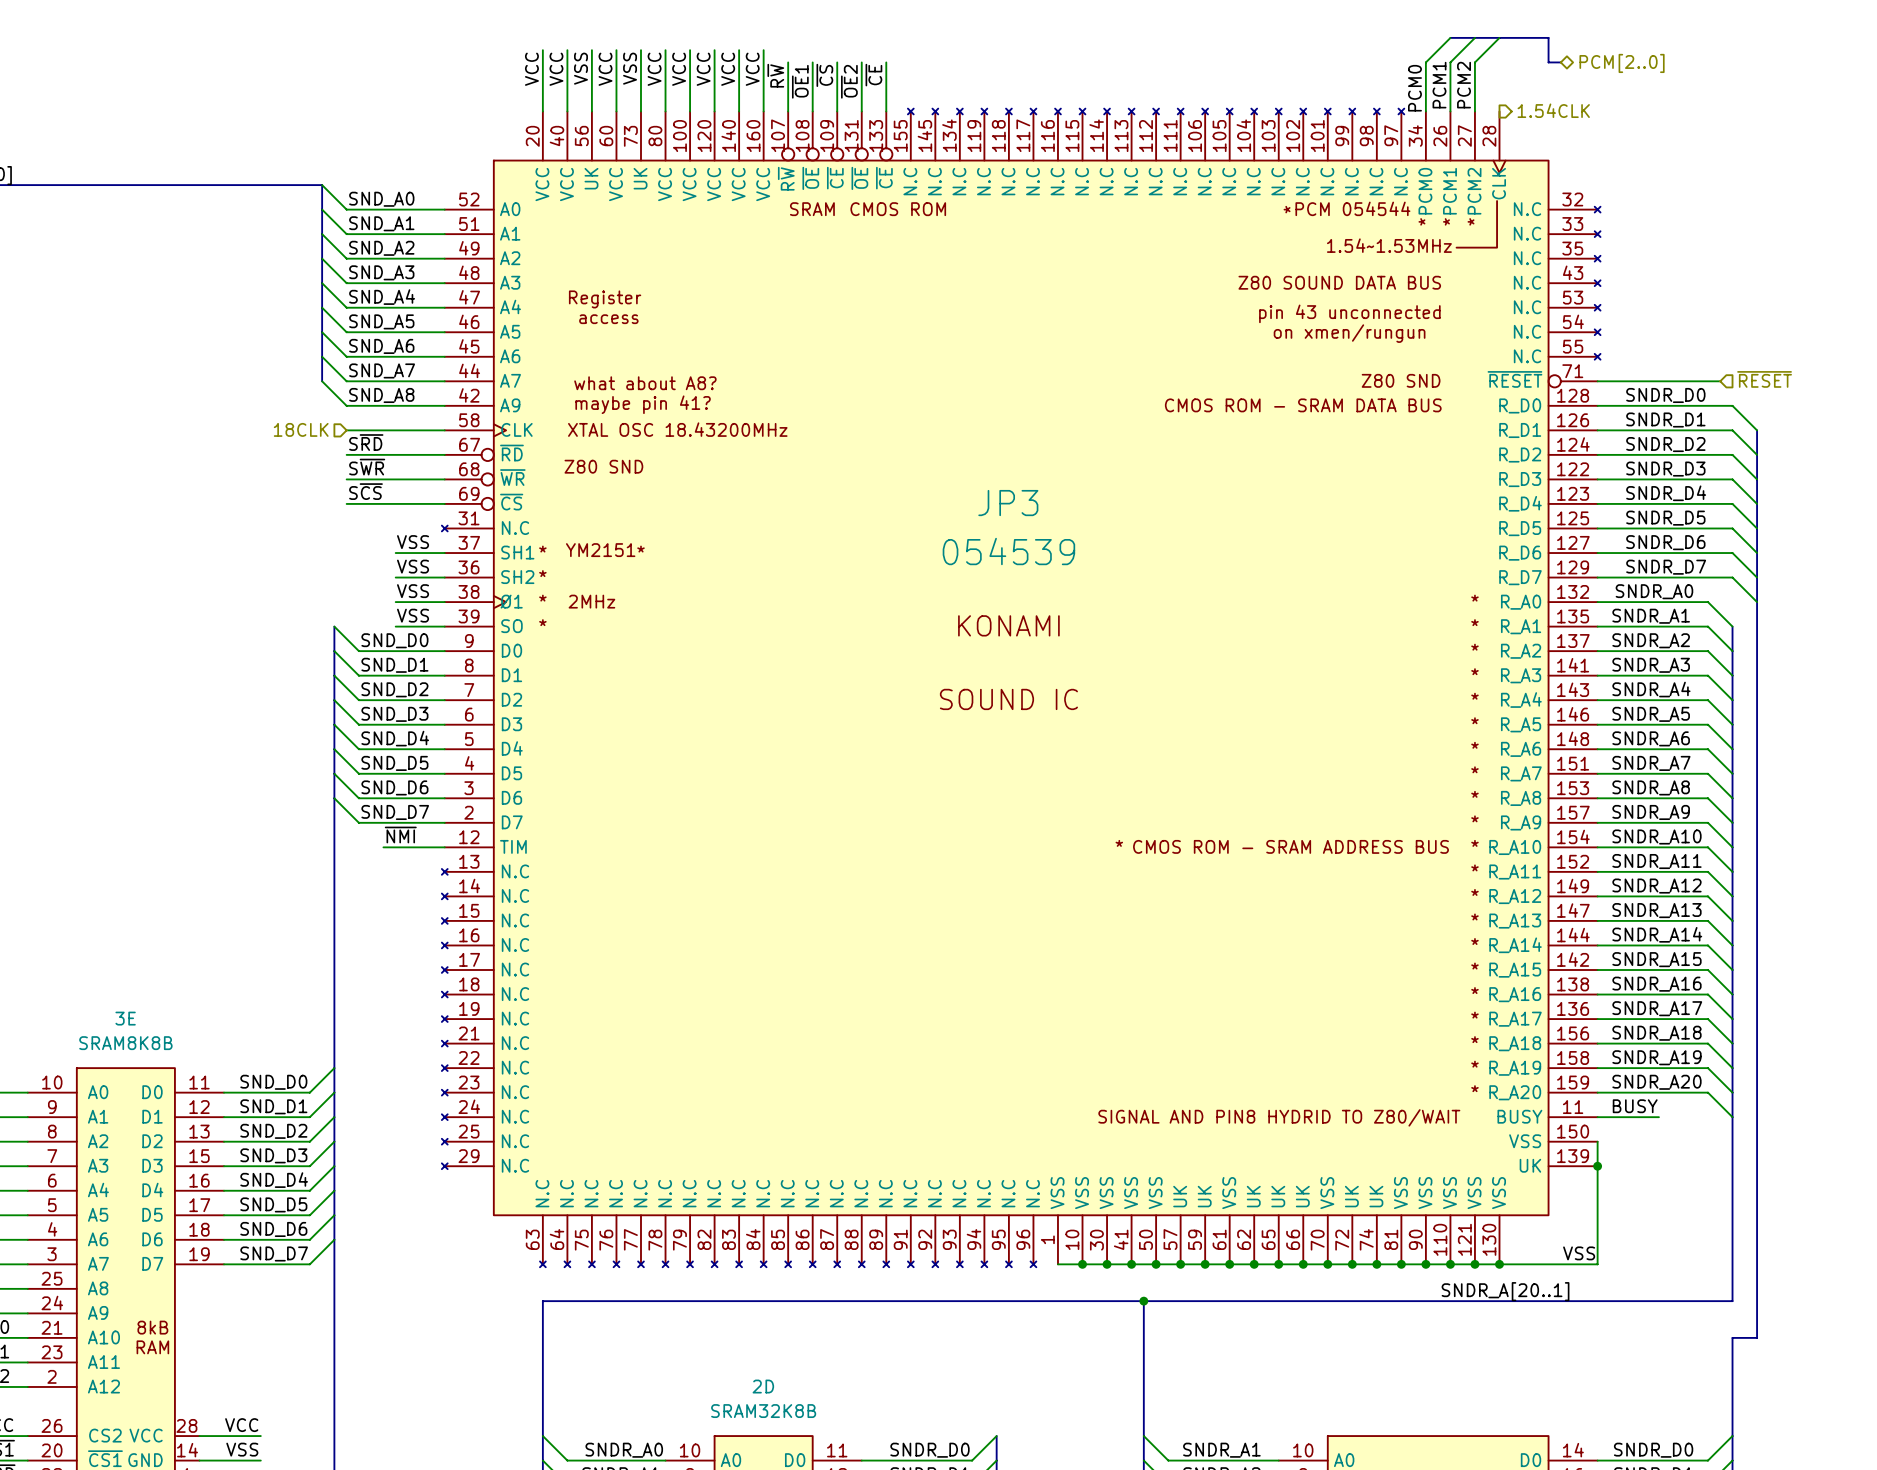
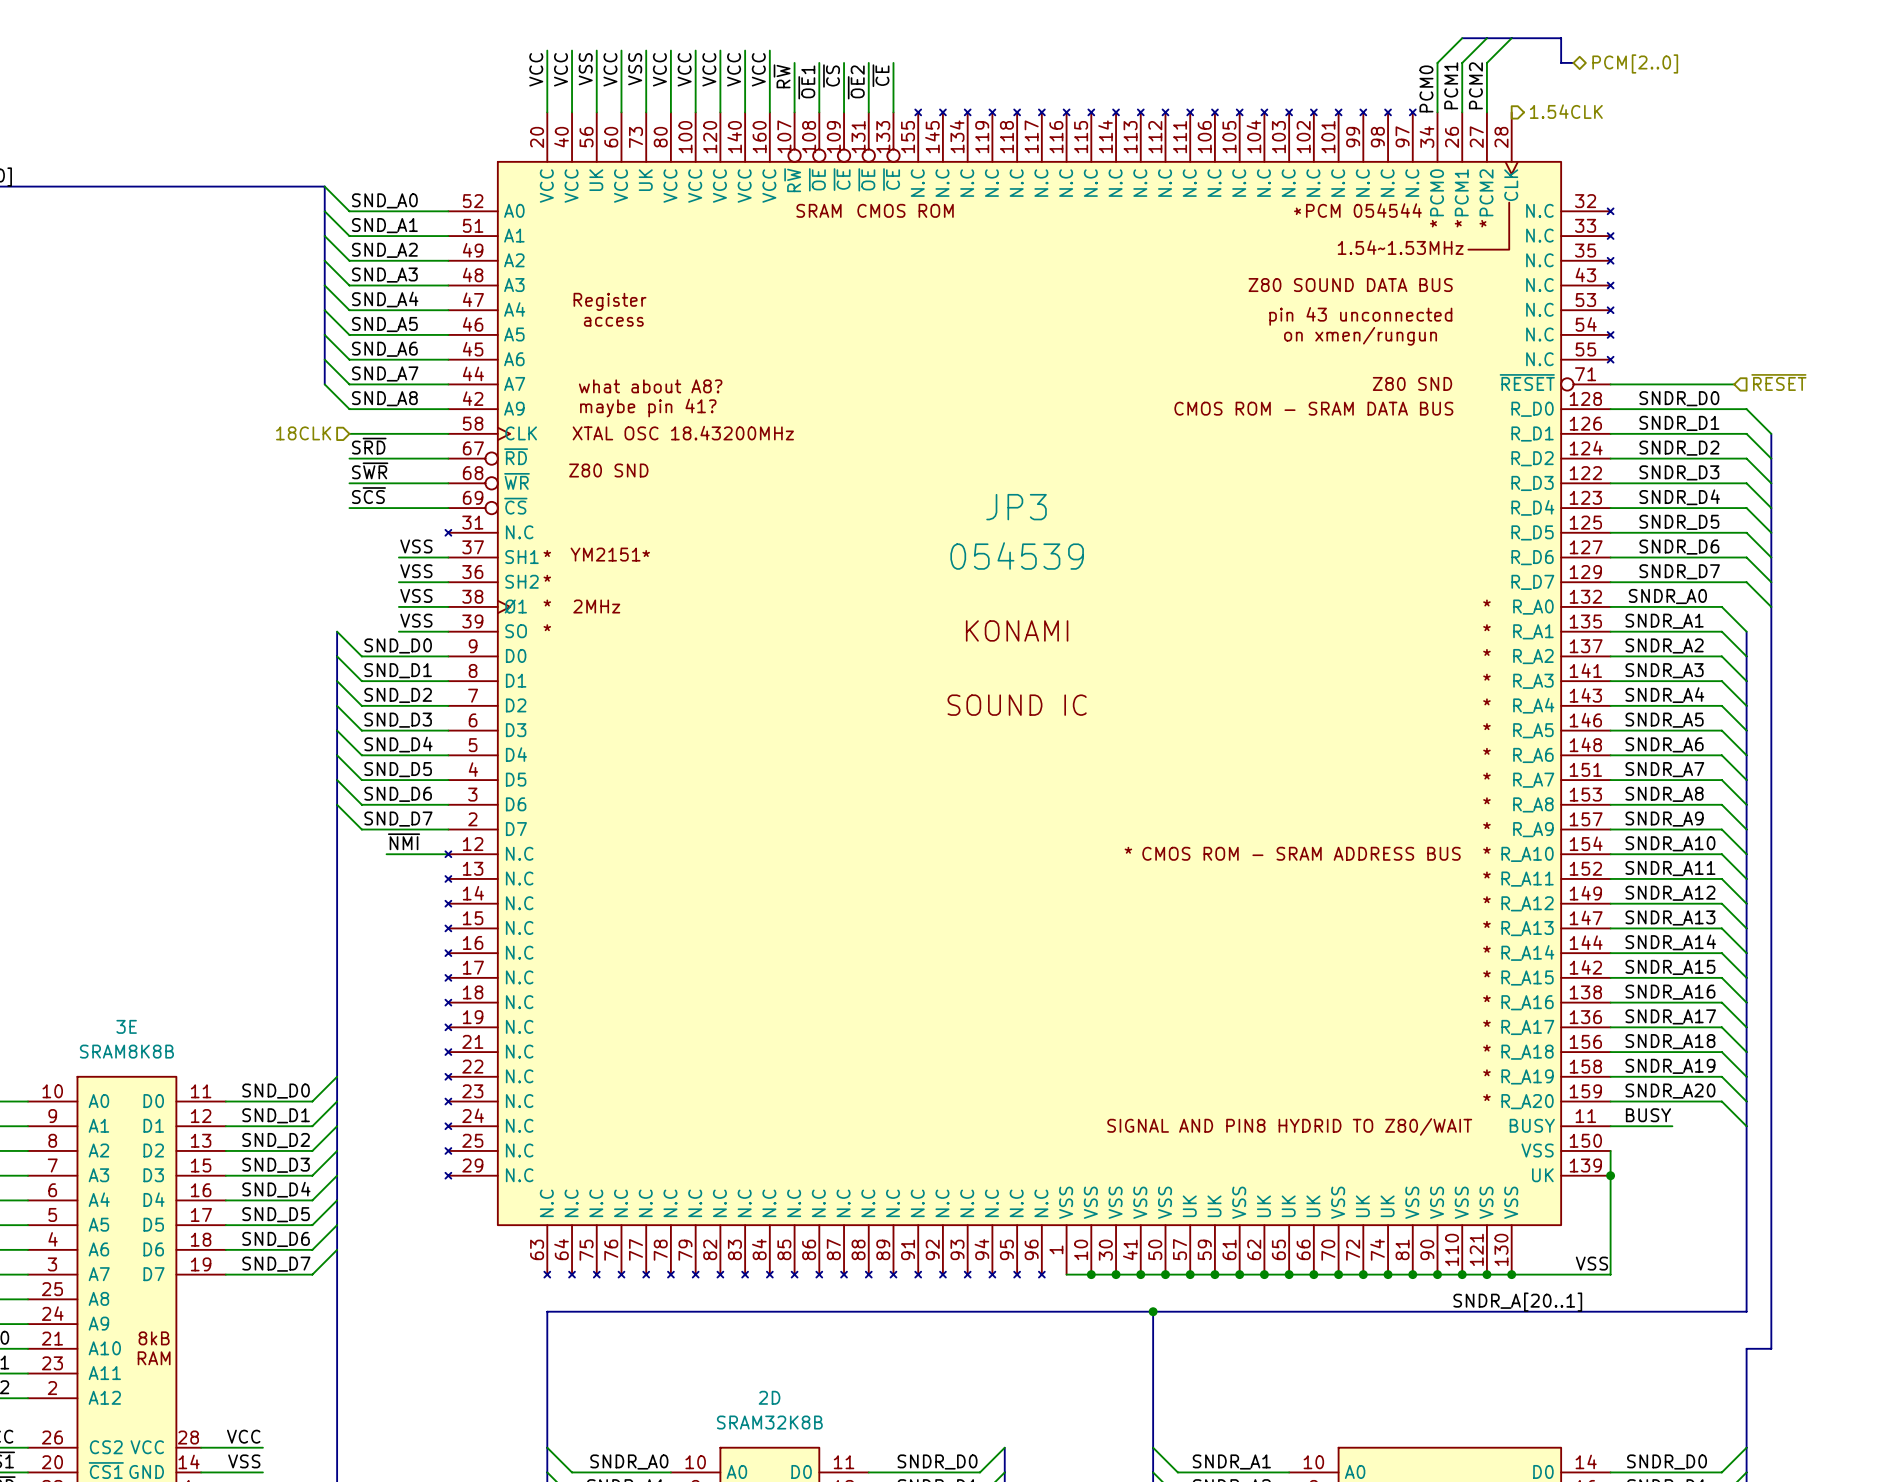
JP3 symbol: [441, 108, 1601, 1268] -> [445, 109, 1614, 1278]

